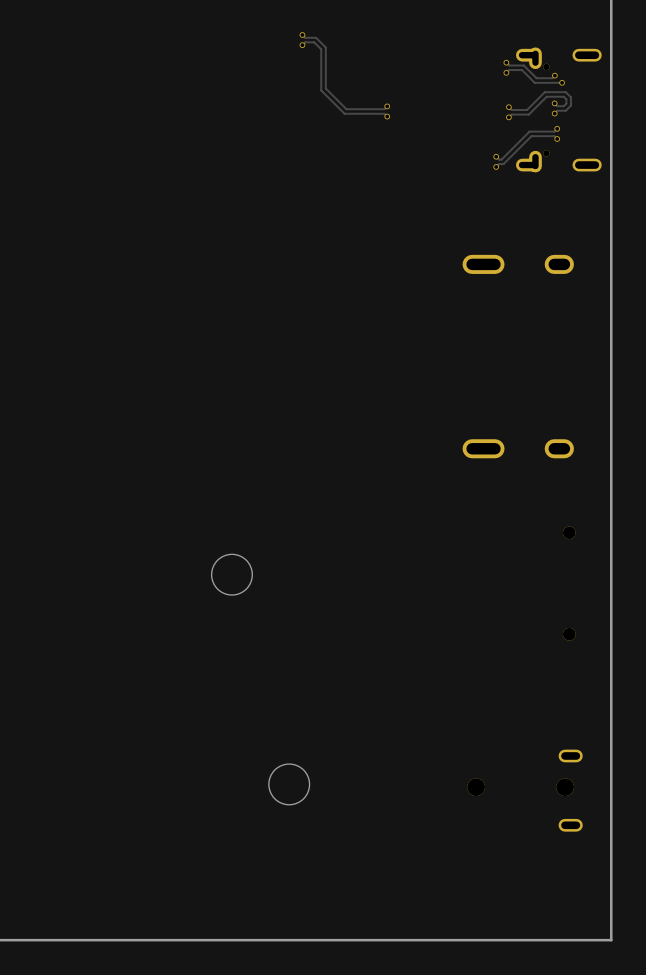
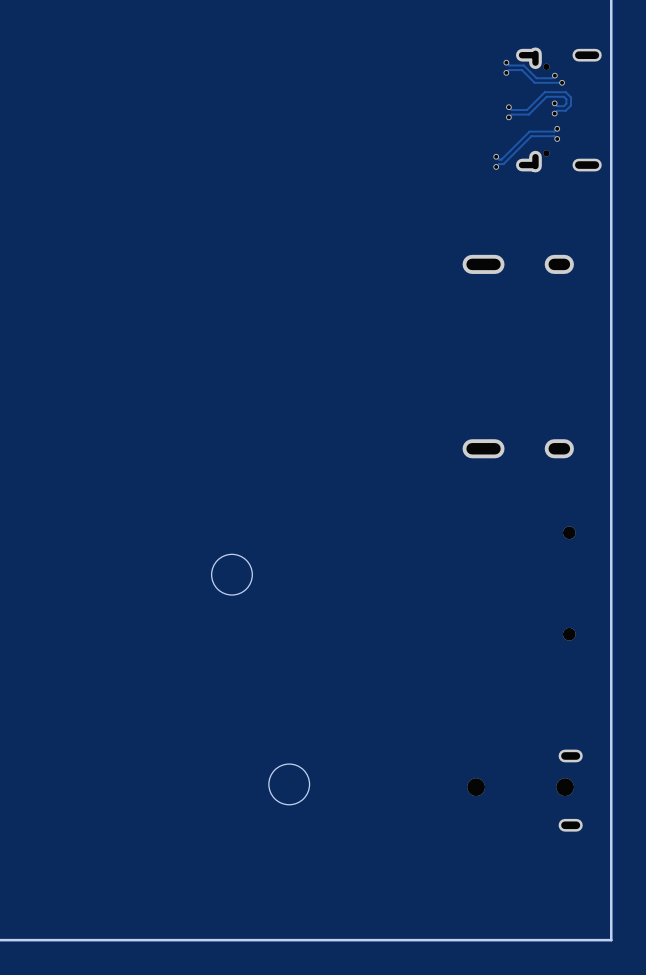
track: (302, 34) (305, 37) (316, 37) (325, 47) (325, 88) (346, 109) (384, 109) (387, 106) -> none
via: (302, 34) -> none
track: (302, 45) (305, 42) (314, 42) (321, 49) (321, 90) (344, 113) (384, 113) (387, 116) -> none
via: (302, 45) -> none
via: (387, 106) -> none
via: (387, 116) -> none

